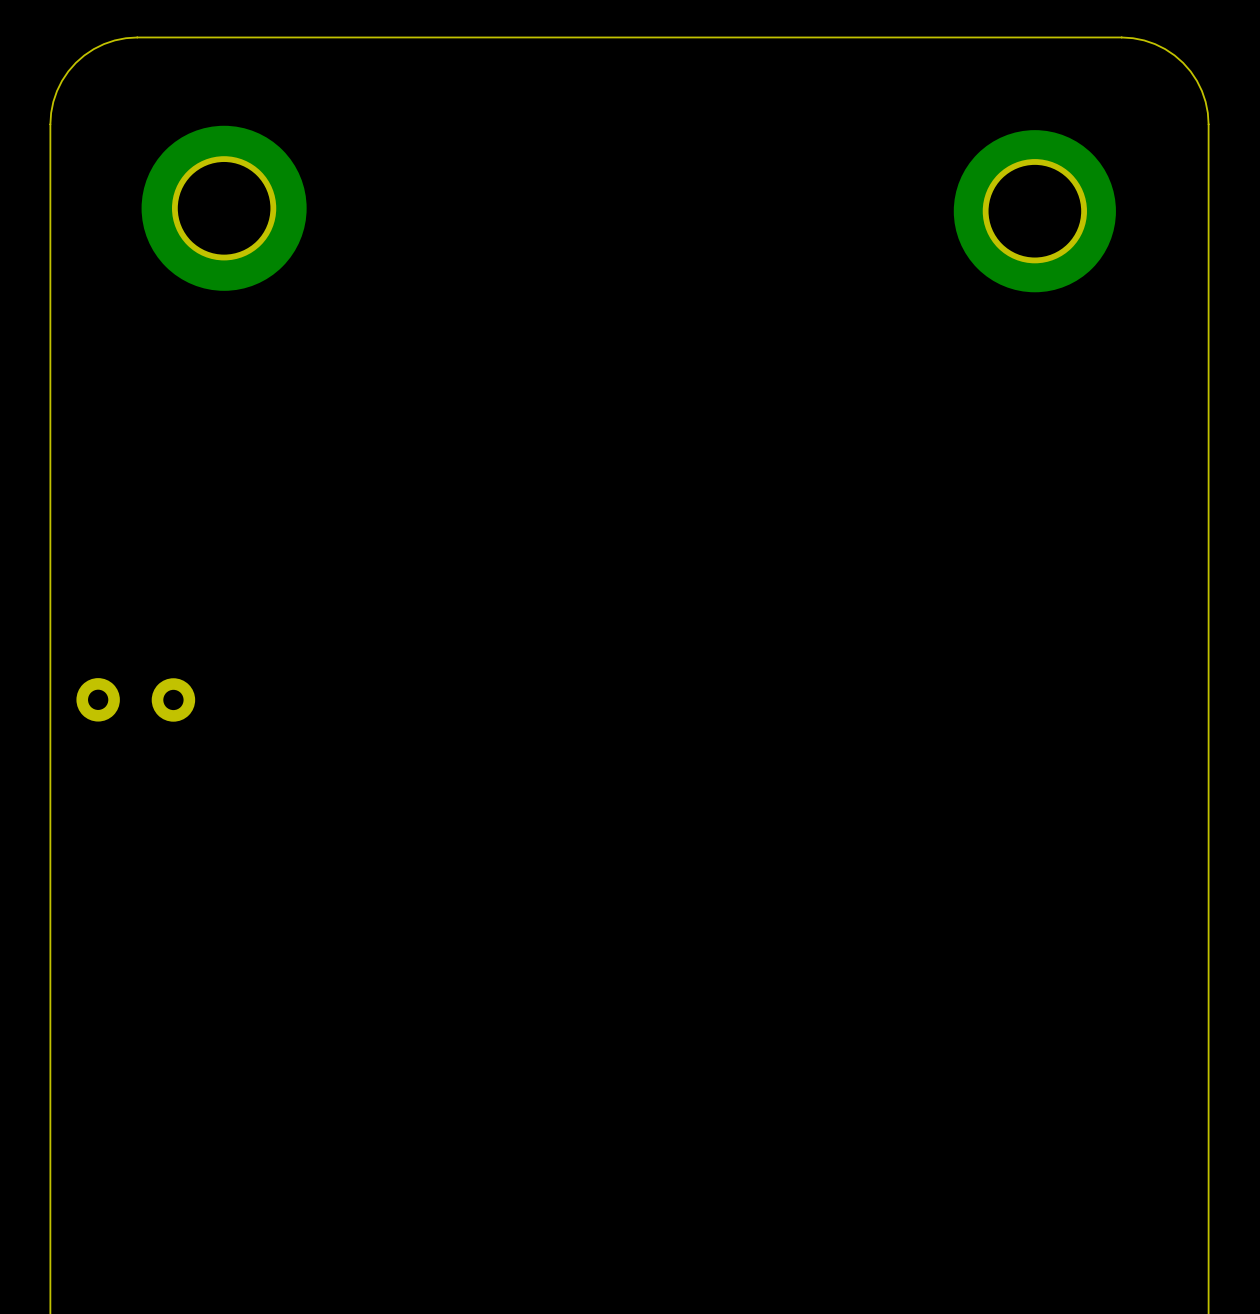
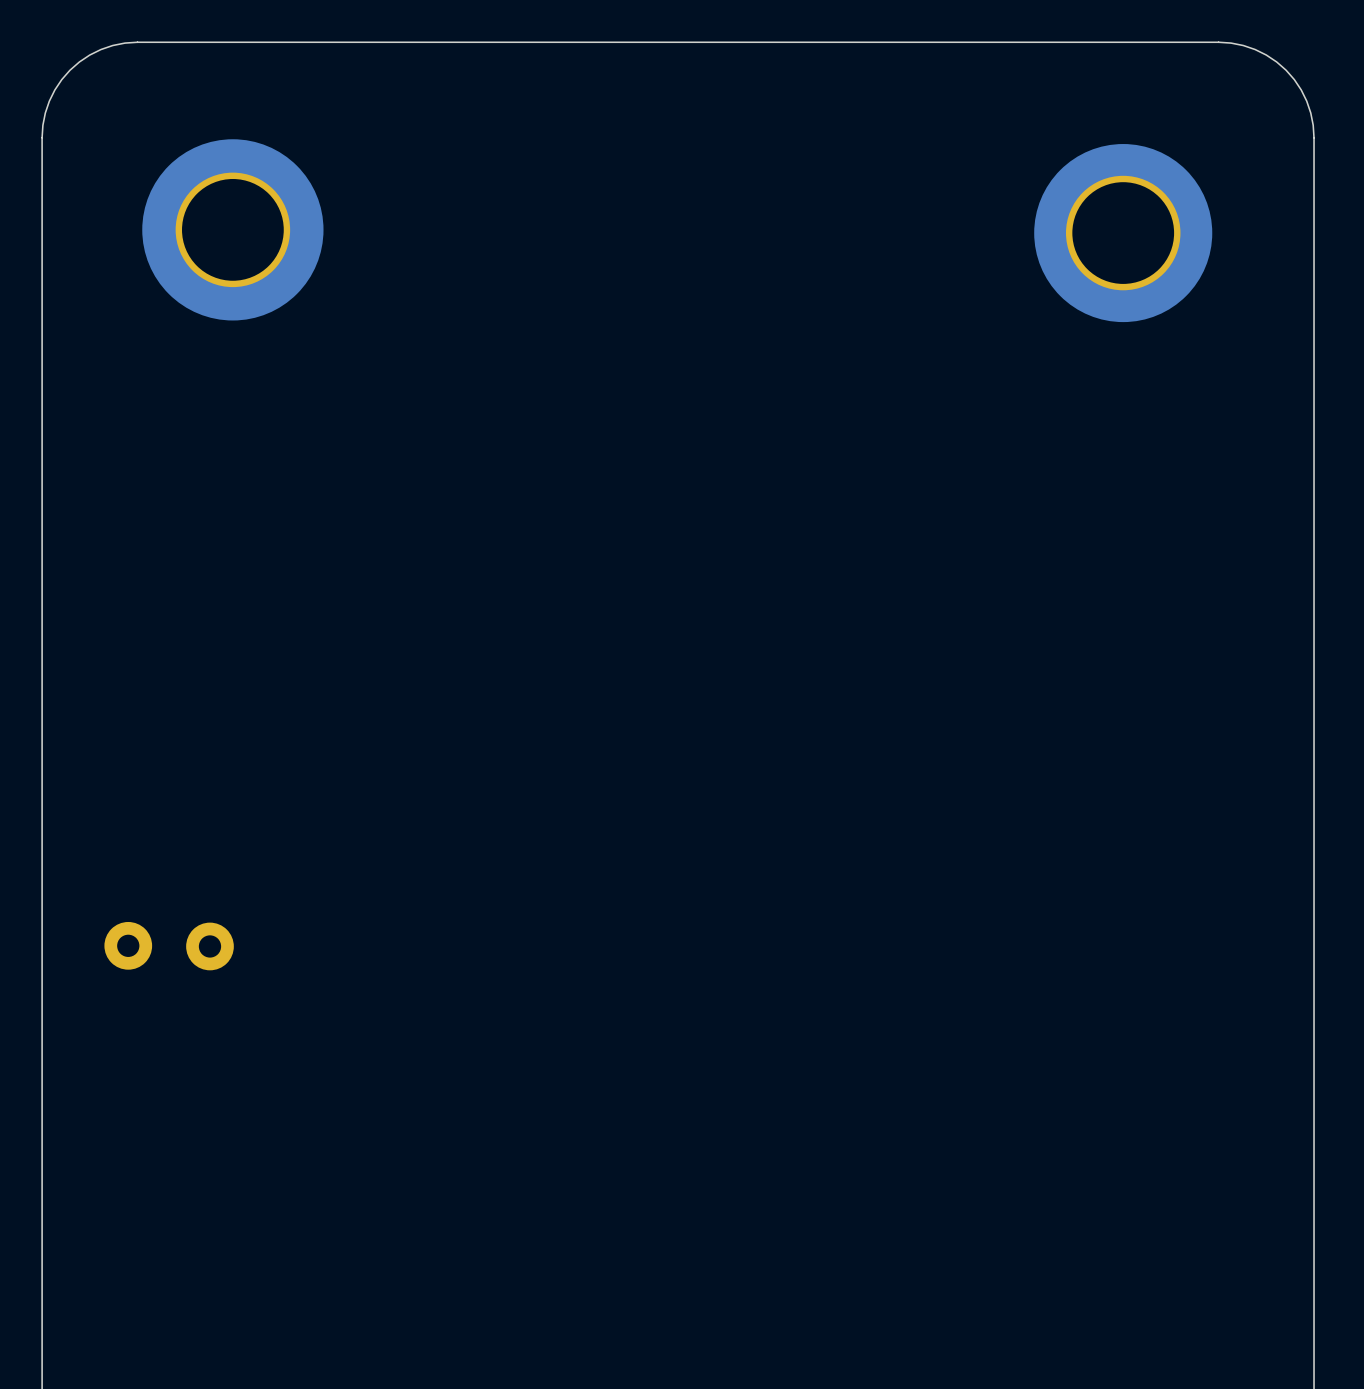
part: (98, 699) -> none
part: (173, 699) -> none
part: none -> (128, 945)
part: none -> (209, 946)

